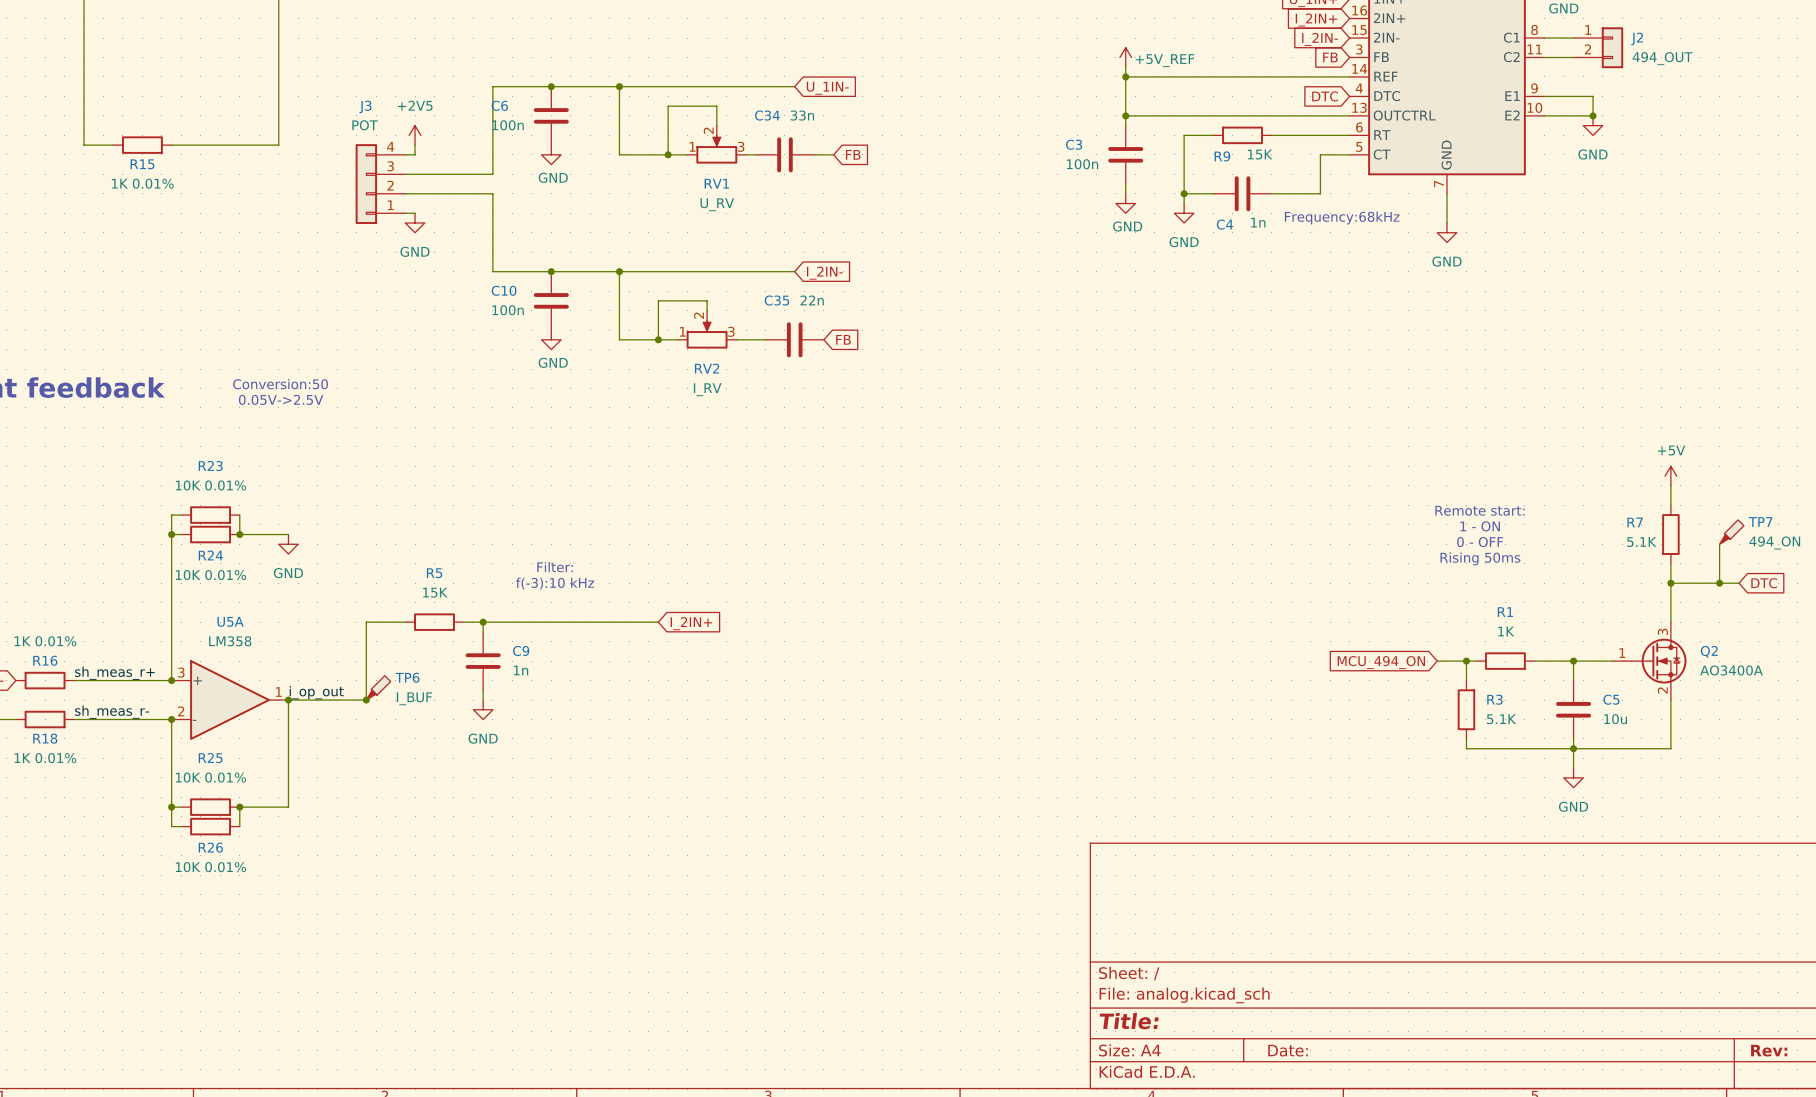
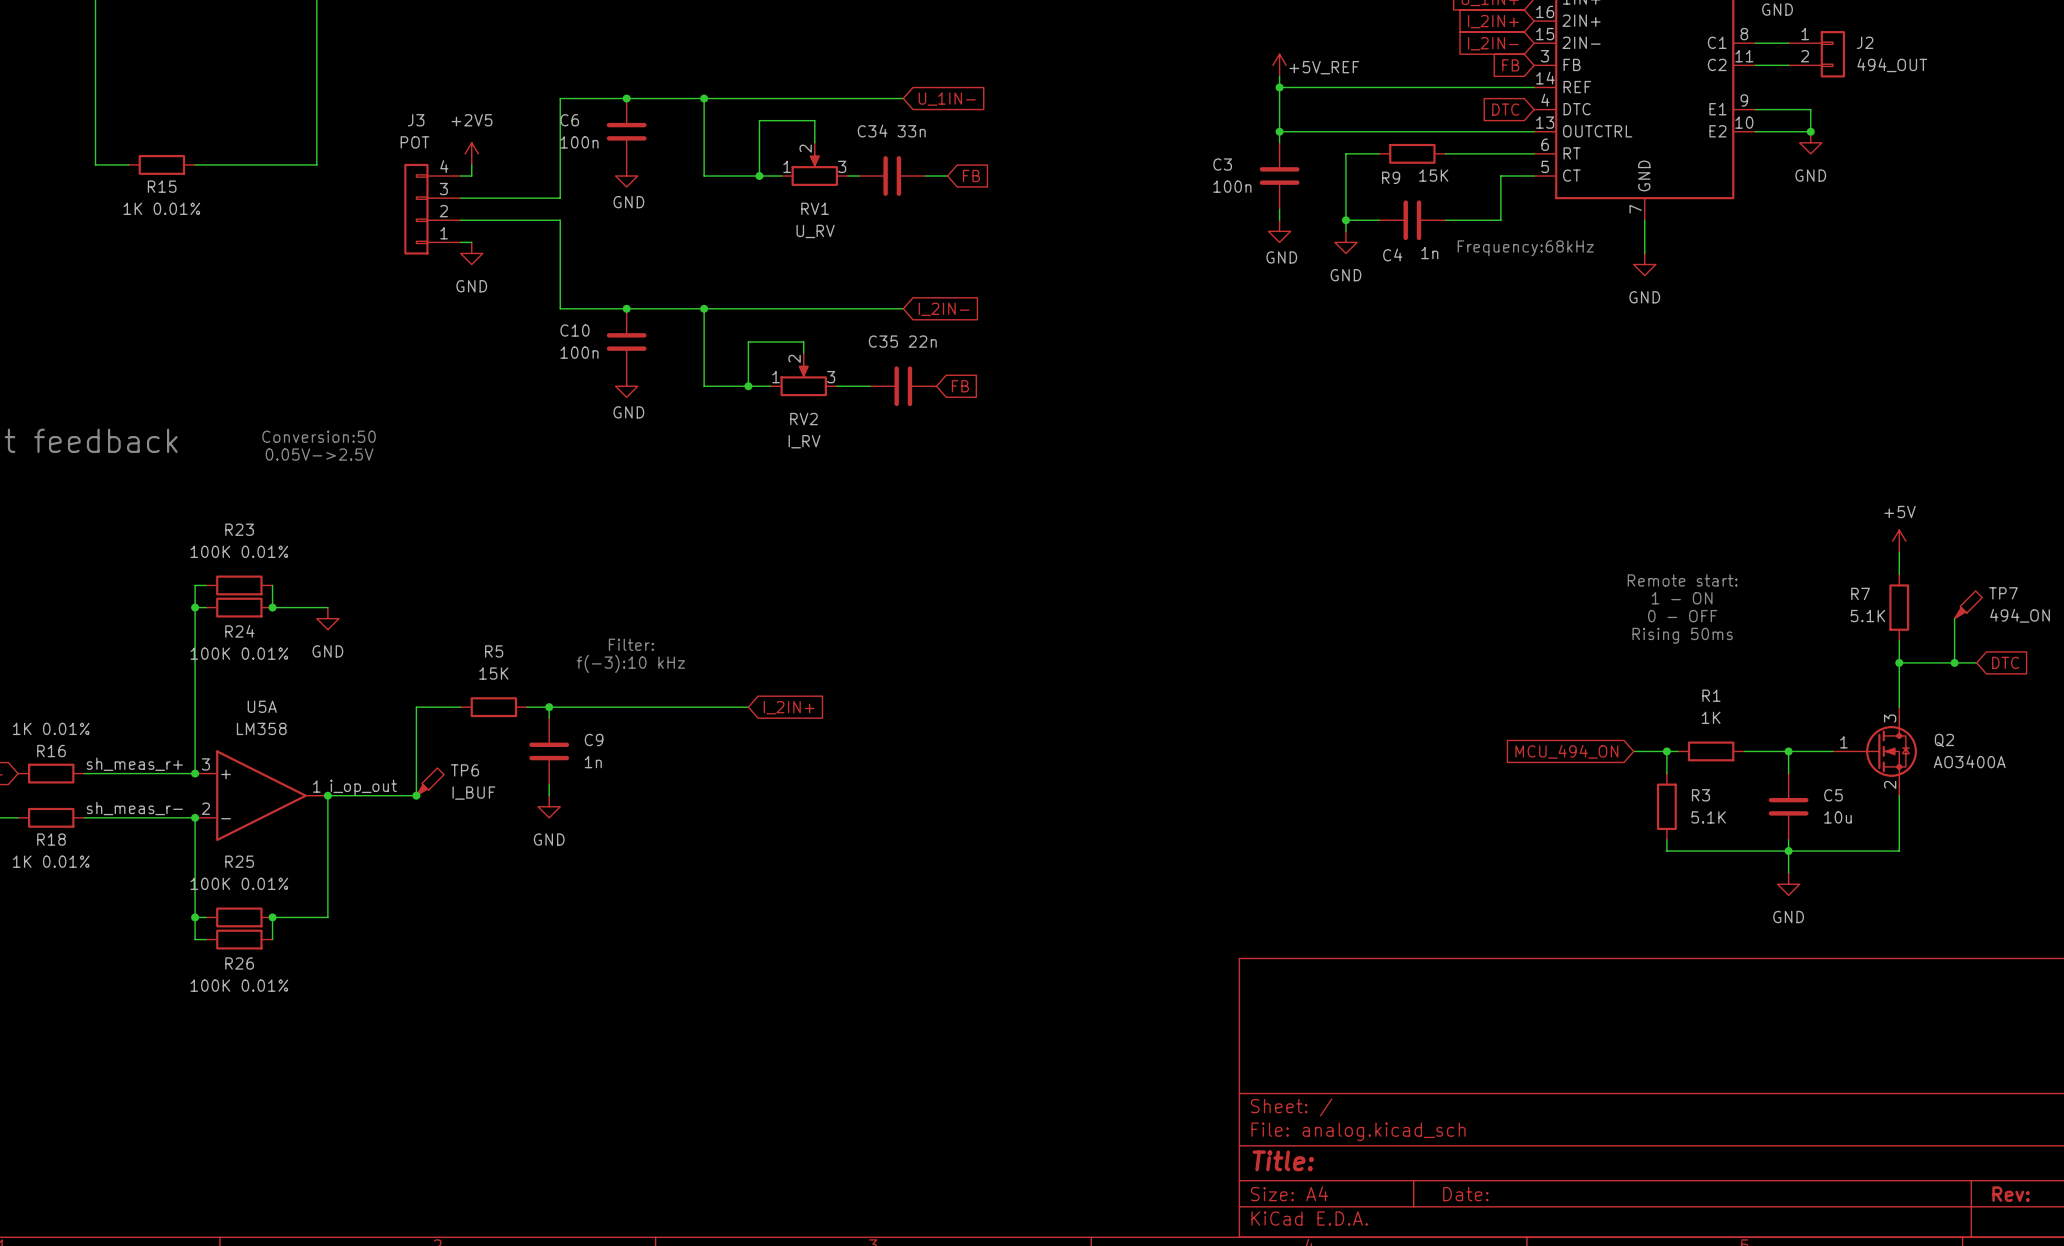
R23 value: 10K 0.01% (210, 485) -> 100K 0.01% (239, 551)
R24 value: 10K 0.01% (210, 575) -> 100K 0.01% (239, 653)
R25 value: 10K 0.01% (210, 777) -> 100K 0.01% (239, 883)
R26 value: 10K 0.01% (210, 867) -> 100K 0.01% (239, 985)

